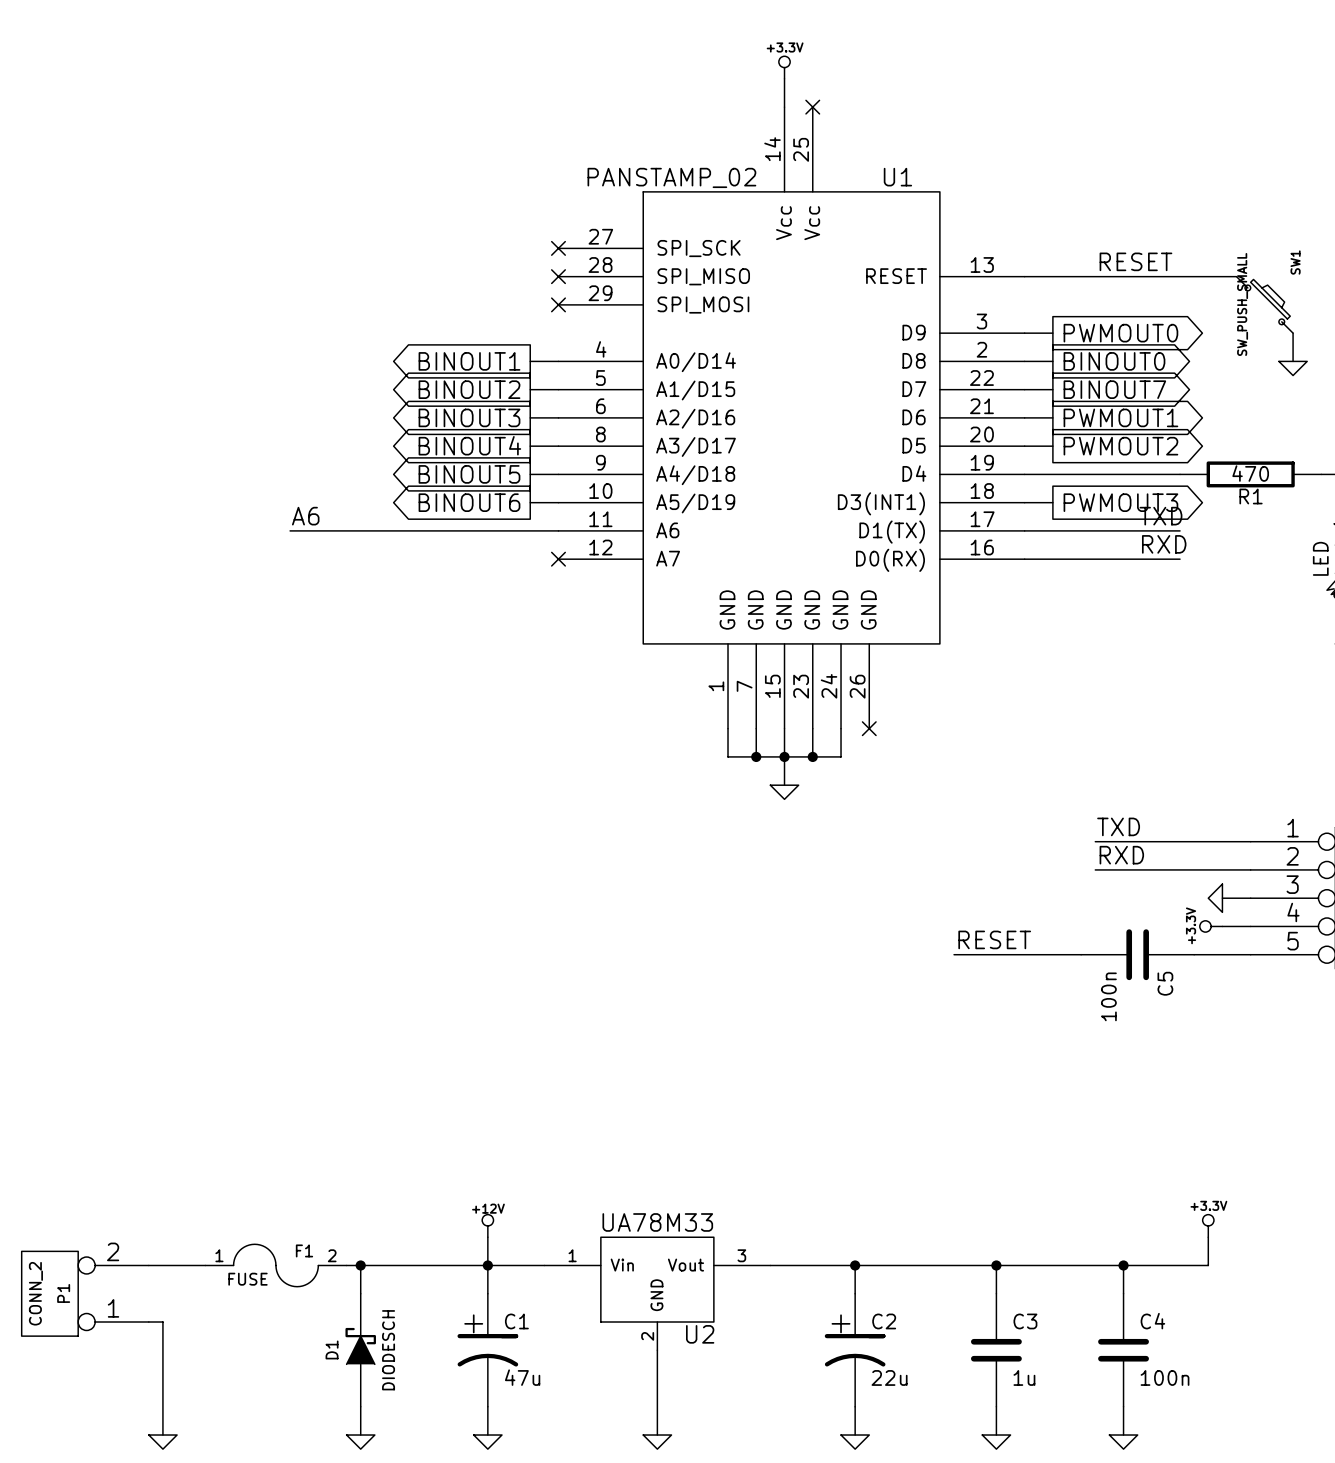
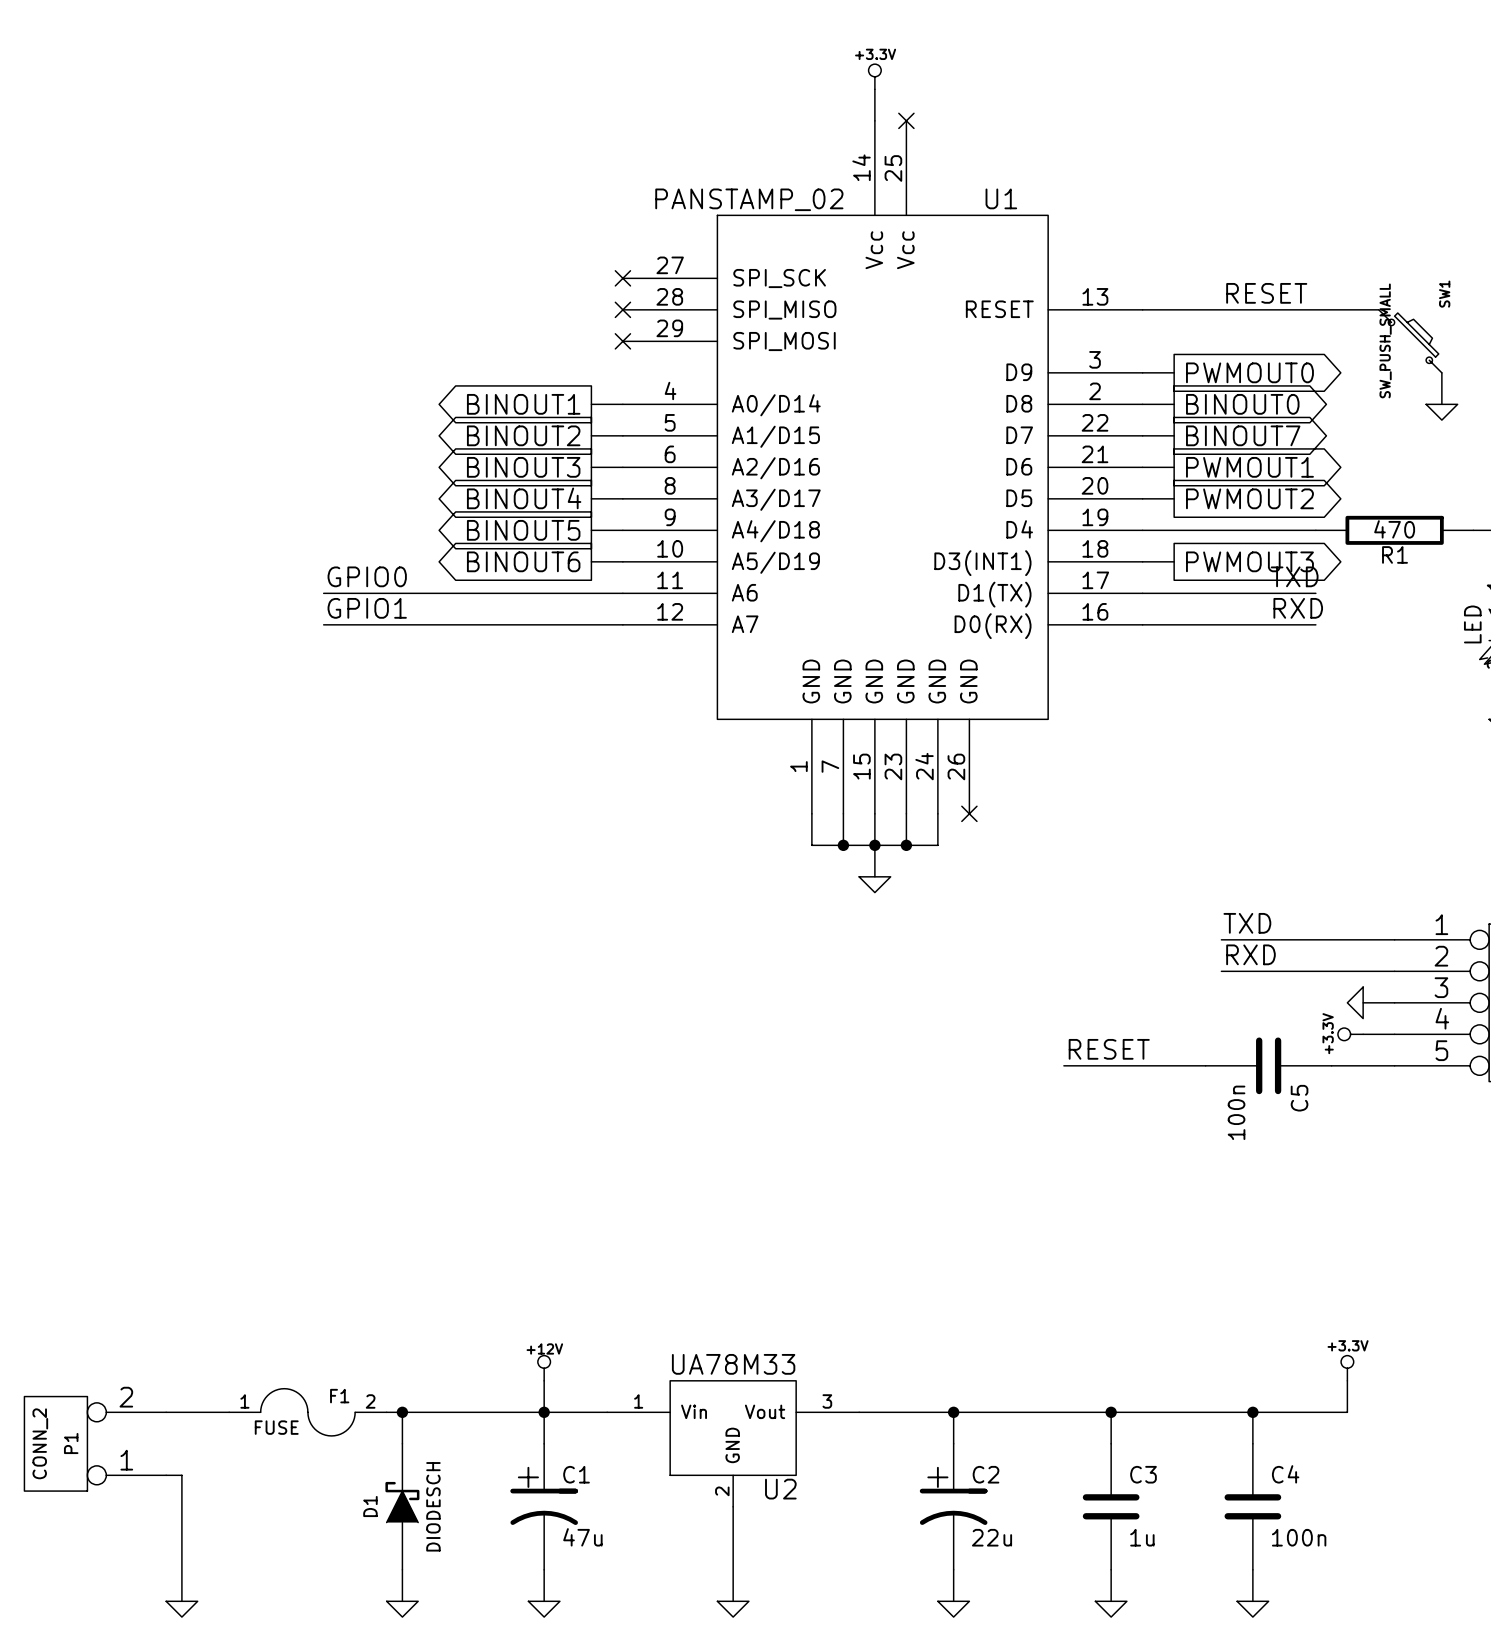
label: A6 (305, 516) -> GPIO0 (367, 576)
label: none -> GPIO1 (367, 608)
wire: none -> (323, 624) (622, 624)
no-connect mark: (558, 559) -> none

